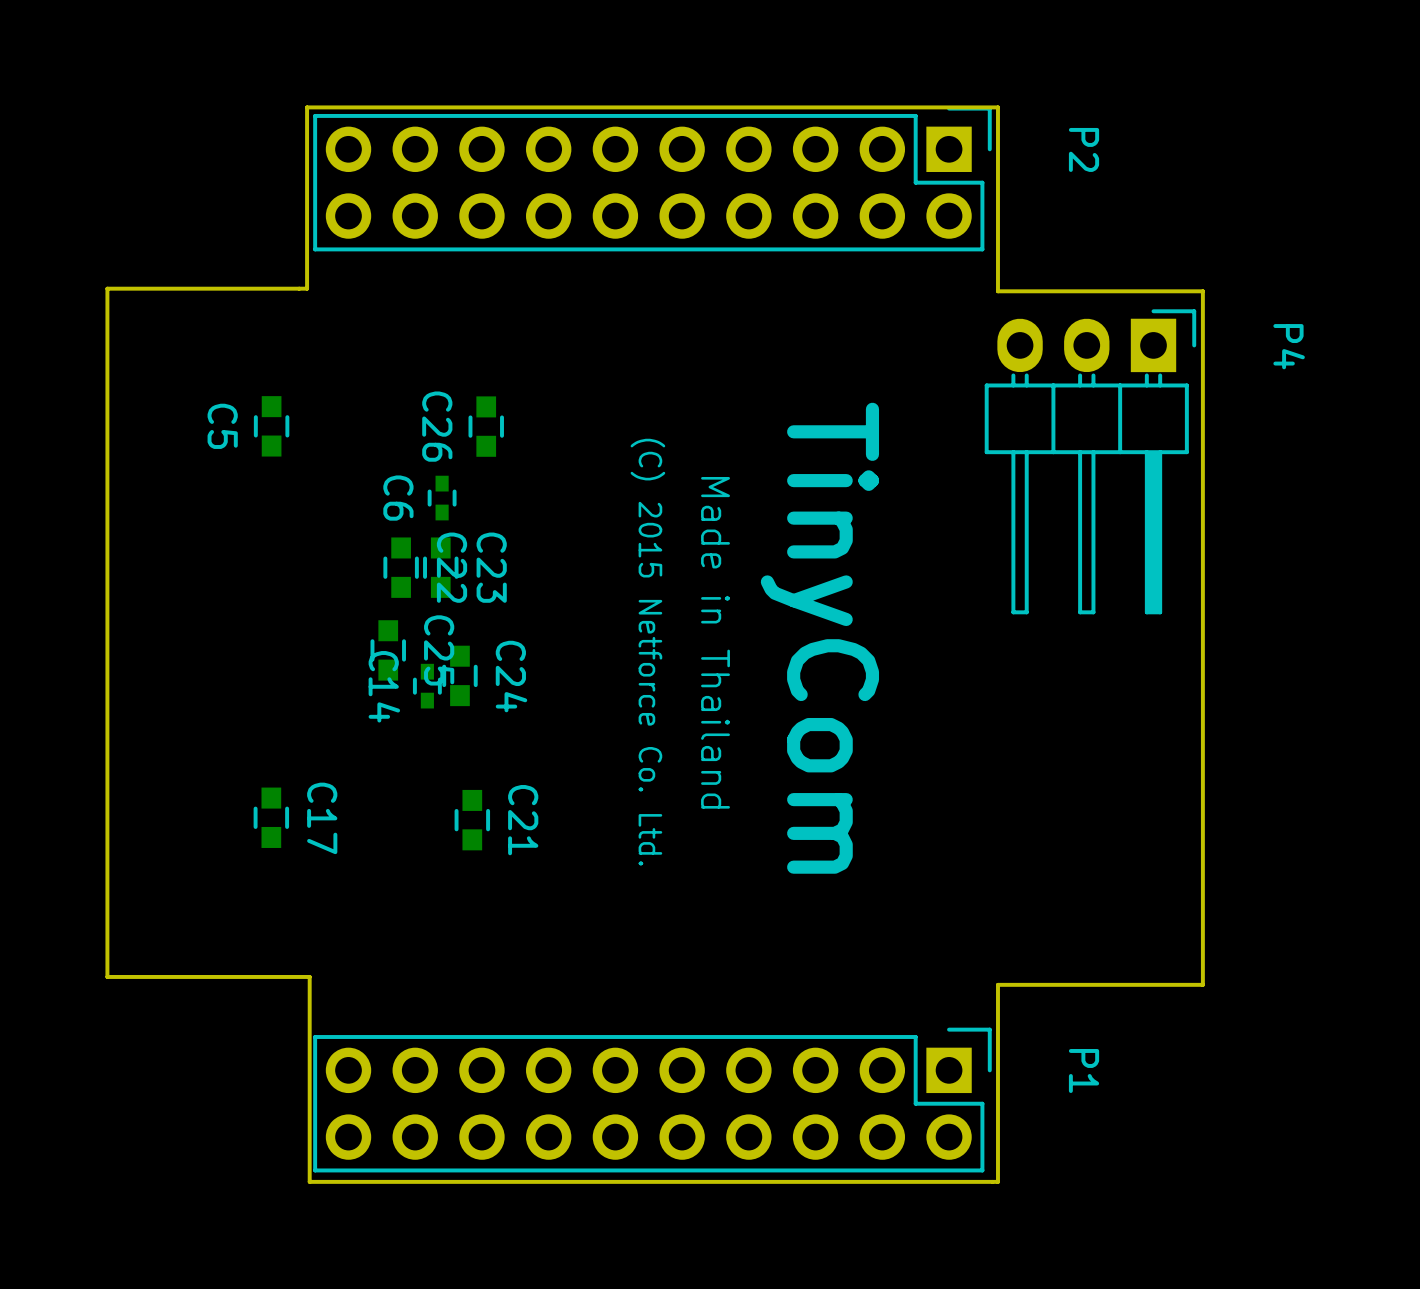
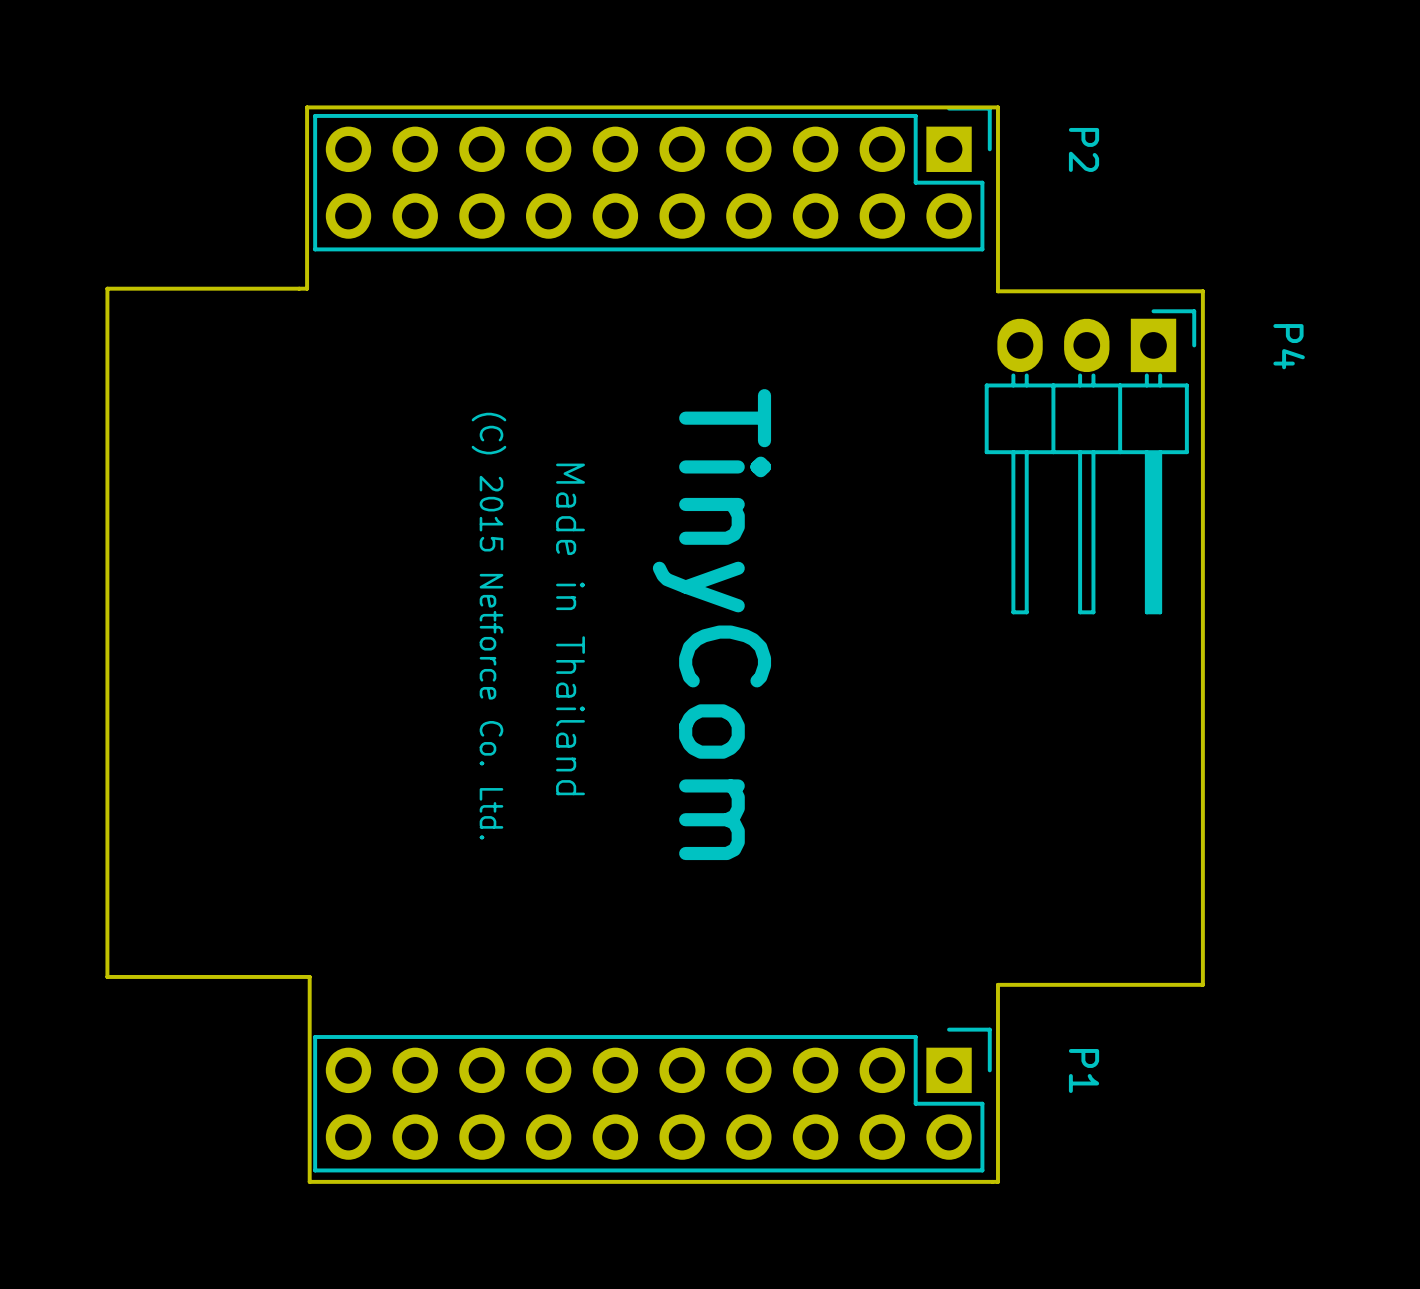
C5: (271, 426) -> none
C26: (486, 426) -> none
C6: (442, 498) -> none
C22: (401, 567) -> none
C23: (440, 567) -> none
text position: TinyCom (819, 638) -> TinyCom (711, 624)
text position: Made in Thailand (715, 642) -> Made in Thailand (570, 629)
C25: (388, 650) -> none
text position: (C) 2015 Netforce Co. Ltd. (647, 652) -> (C) 2015 Netforce Co. Ltd. (488, 626)
C24: (459, 675) -> none
C14: (427, 686) -> none
C17: (271, 817) -> none
C21: (472, 820) -> none

